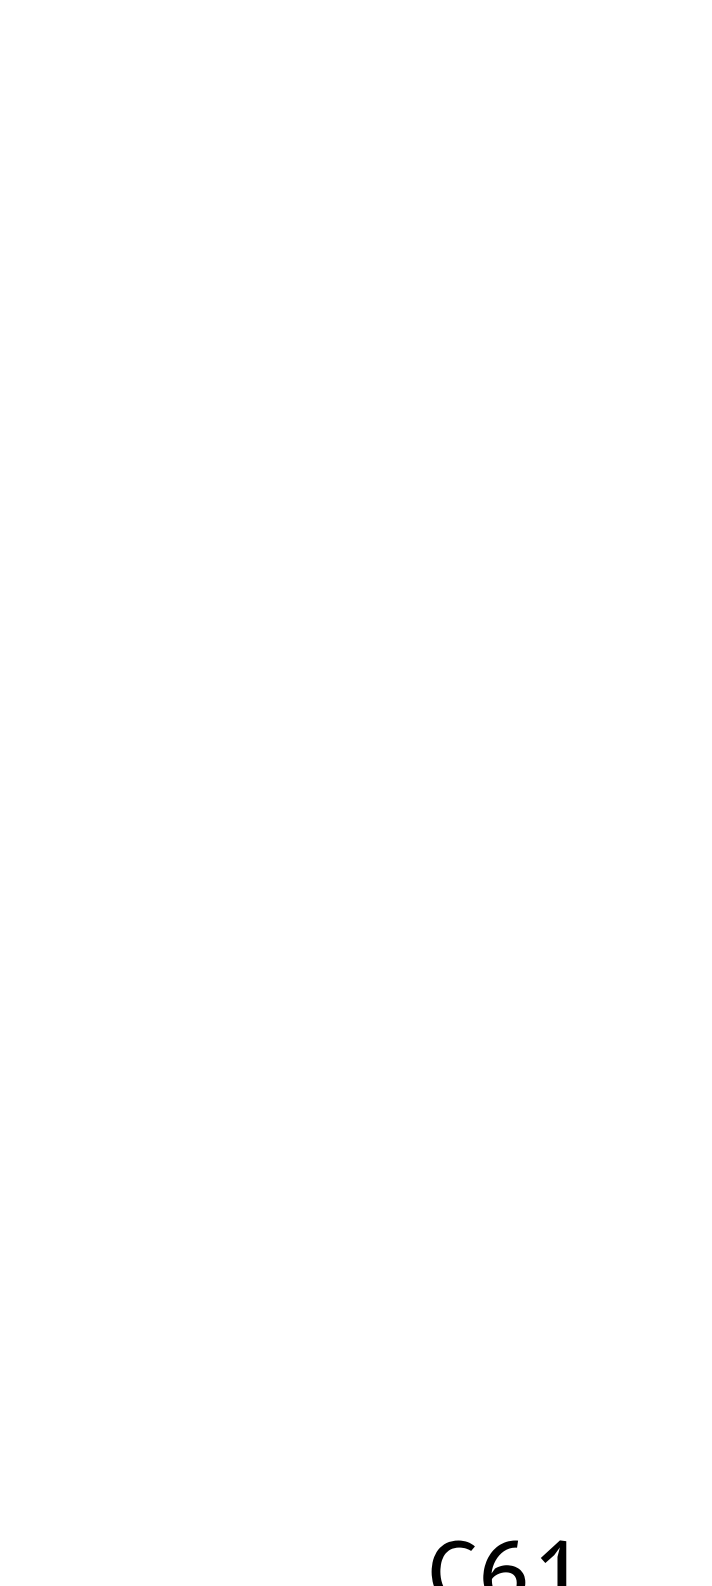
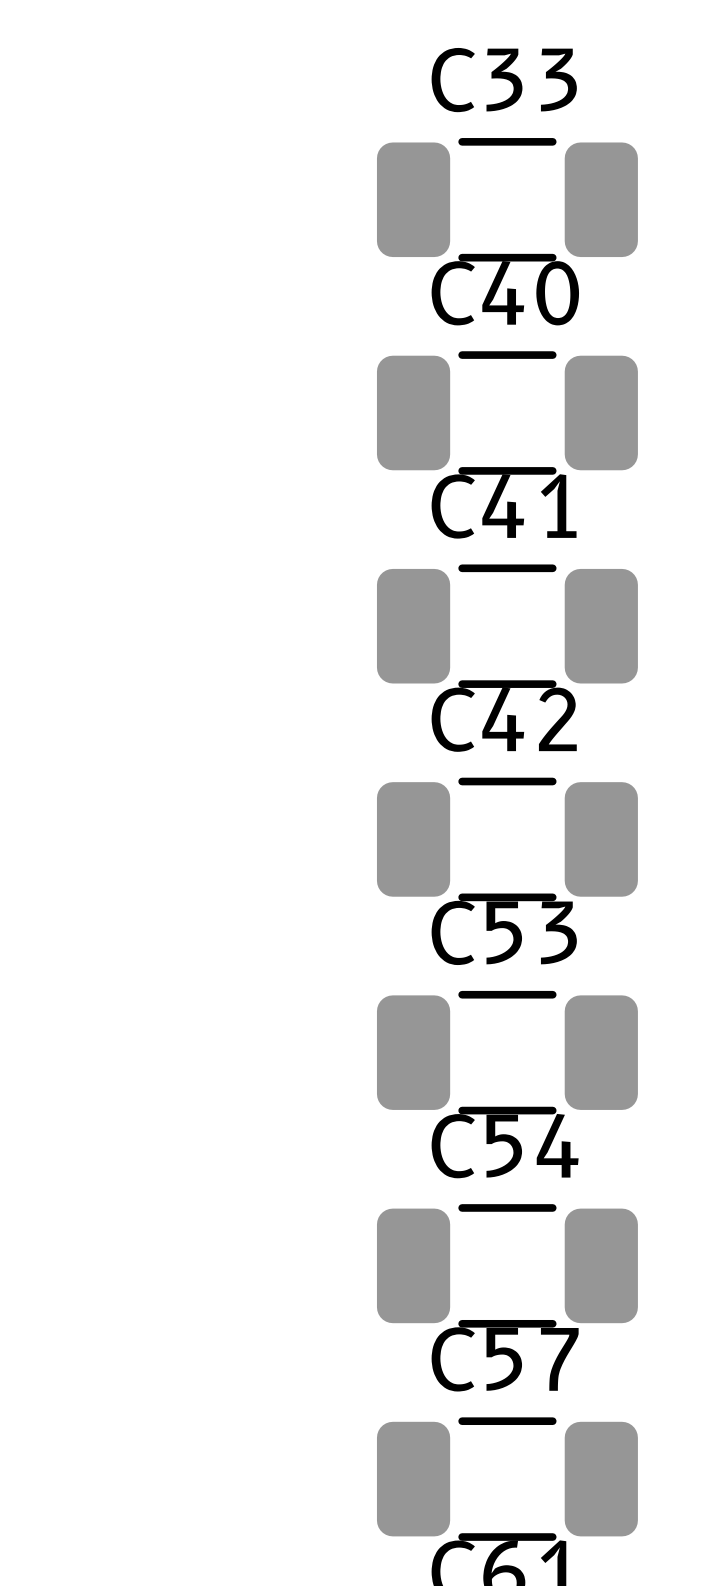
C33: none -> (507, 199)
C40: none -> (507, 412)
C41: none -> (507, 626)
C42: none -> (507, 839)
C53: none -> (507, 1052)
C54: none -> (507, 1265)
C57: none -> (507, 1479)

